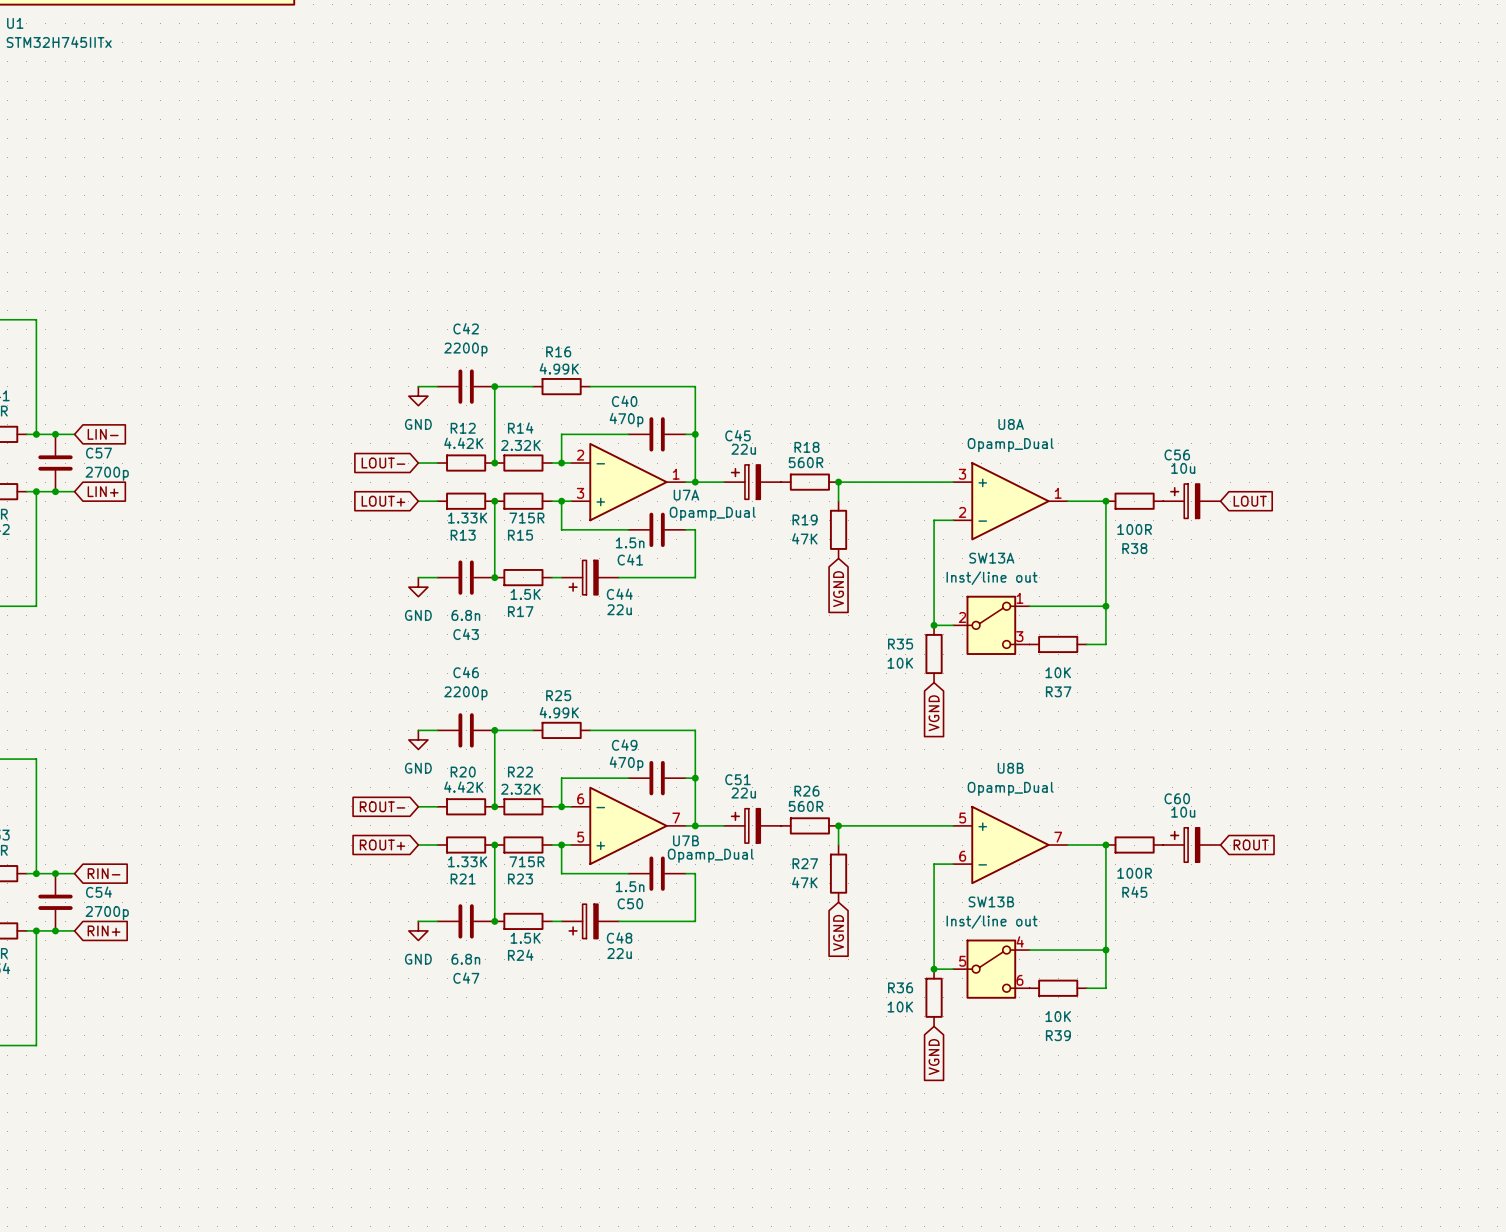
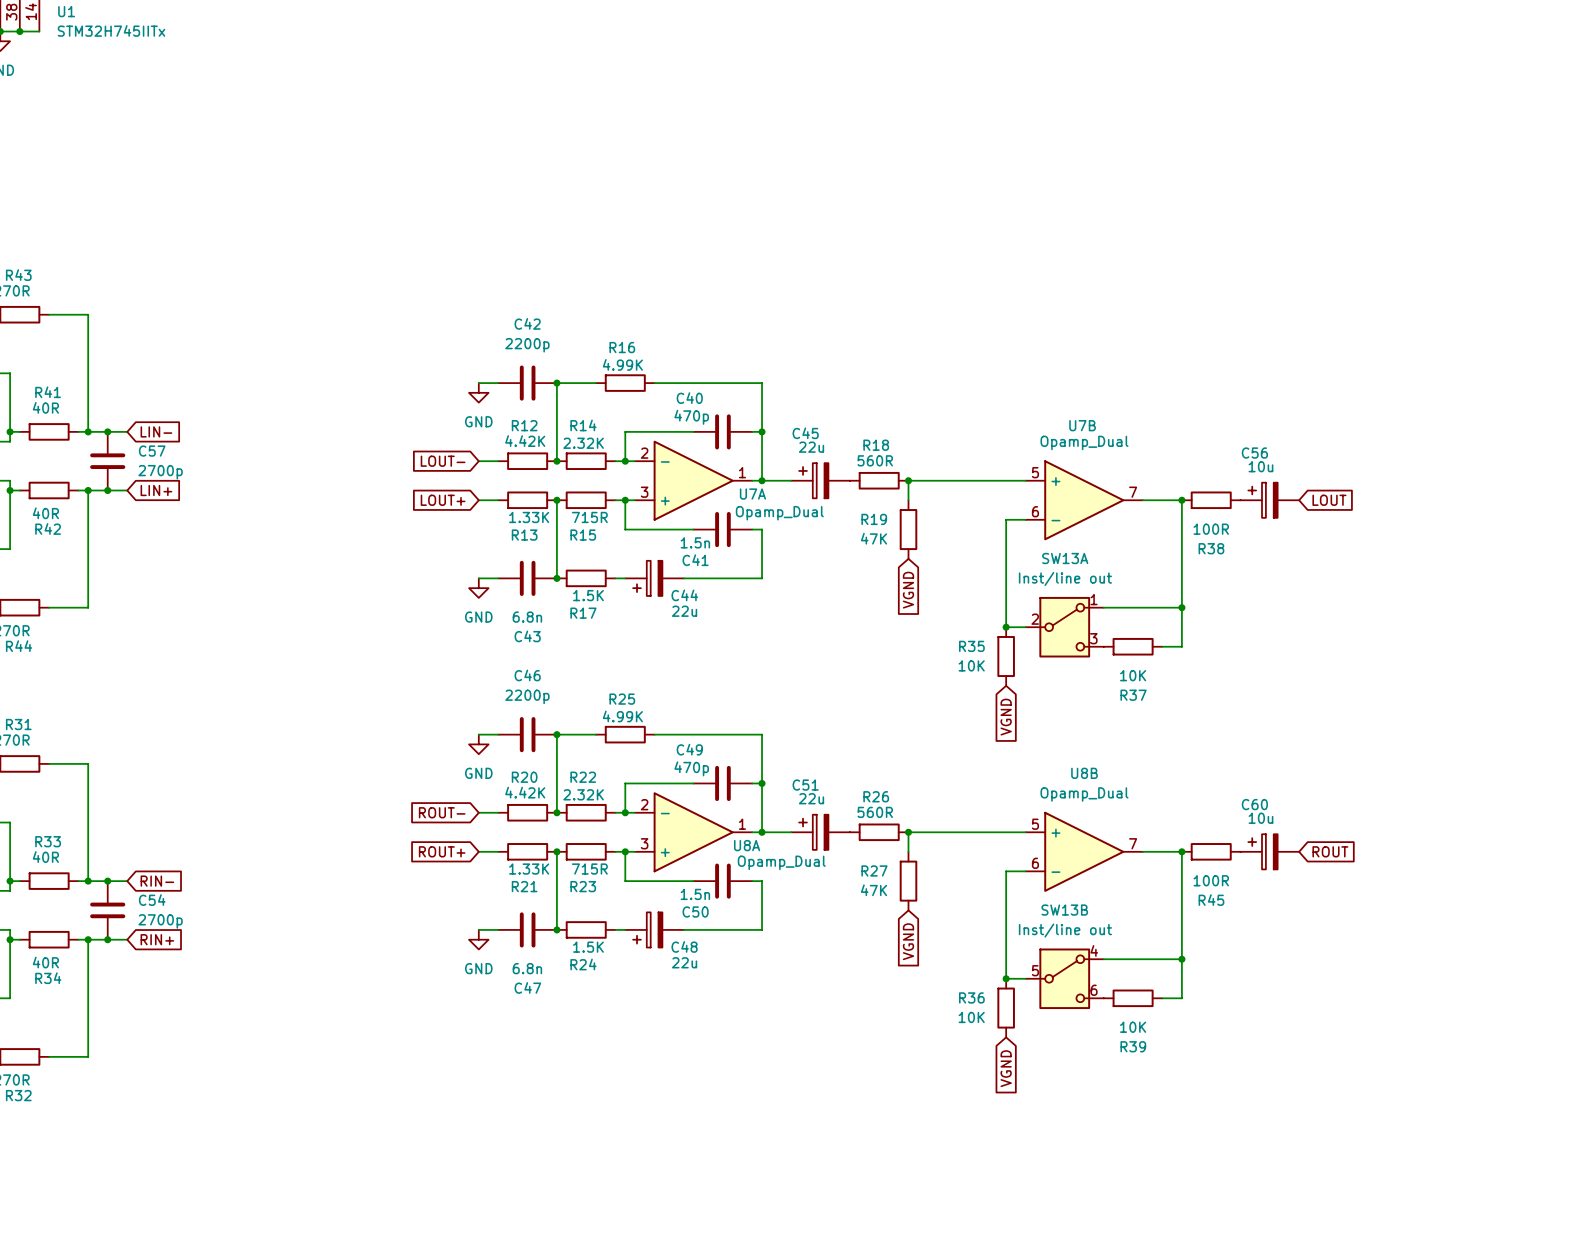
U8A name position: U8A (1011, 424) -> U8A (747, 845)
U8A value position: Opamp_Dual (1010, 445) -> Opamp_Dual (781, 862)
U8A flip: as is (1010, 501) -> up-down (693, 832)
U8A position: (1010, 501) -> (693, 832)
U7B flip: as is (628, 825) -> up-down (1084, 500)
U7B position: (628, 825) -> (1084, 500)
U7B name position: U7B (685, 840) -> U7B (1082, 425)
U7B value position: Opamp_Dual (710, 855) -> Opamp_Dual (1084, 442)

